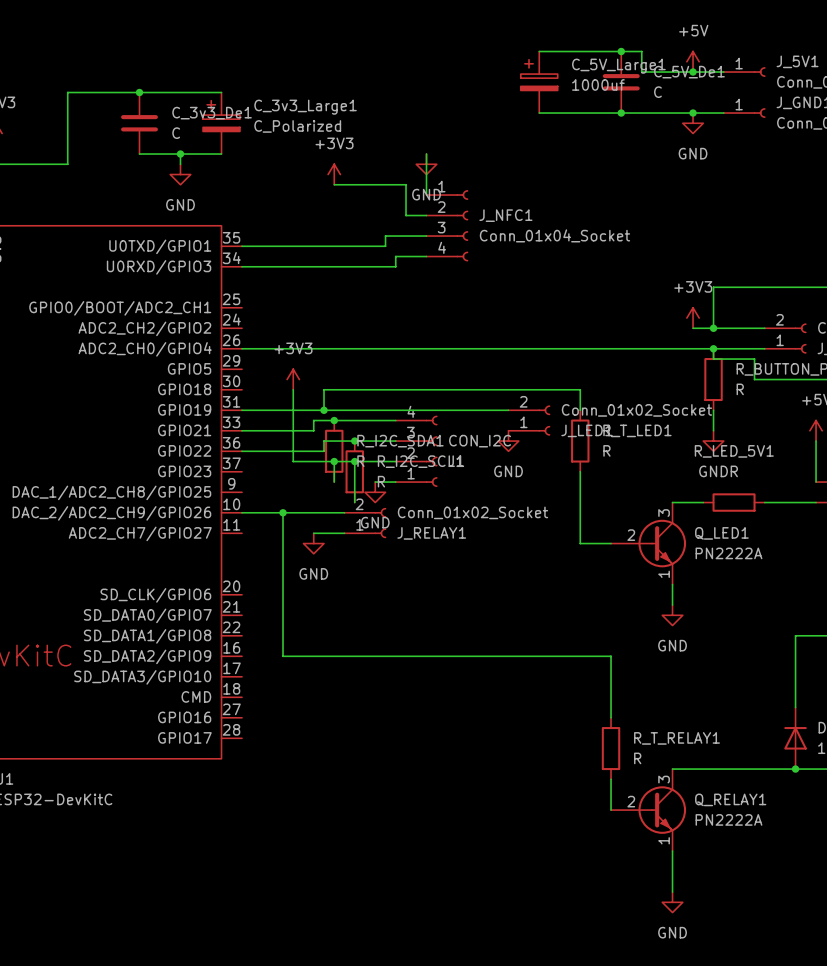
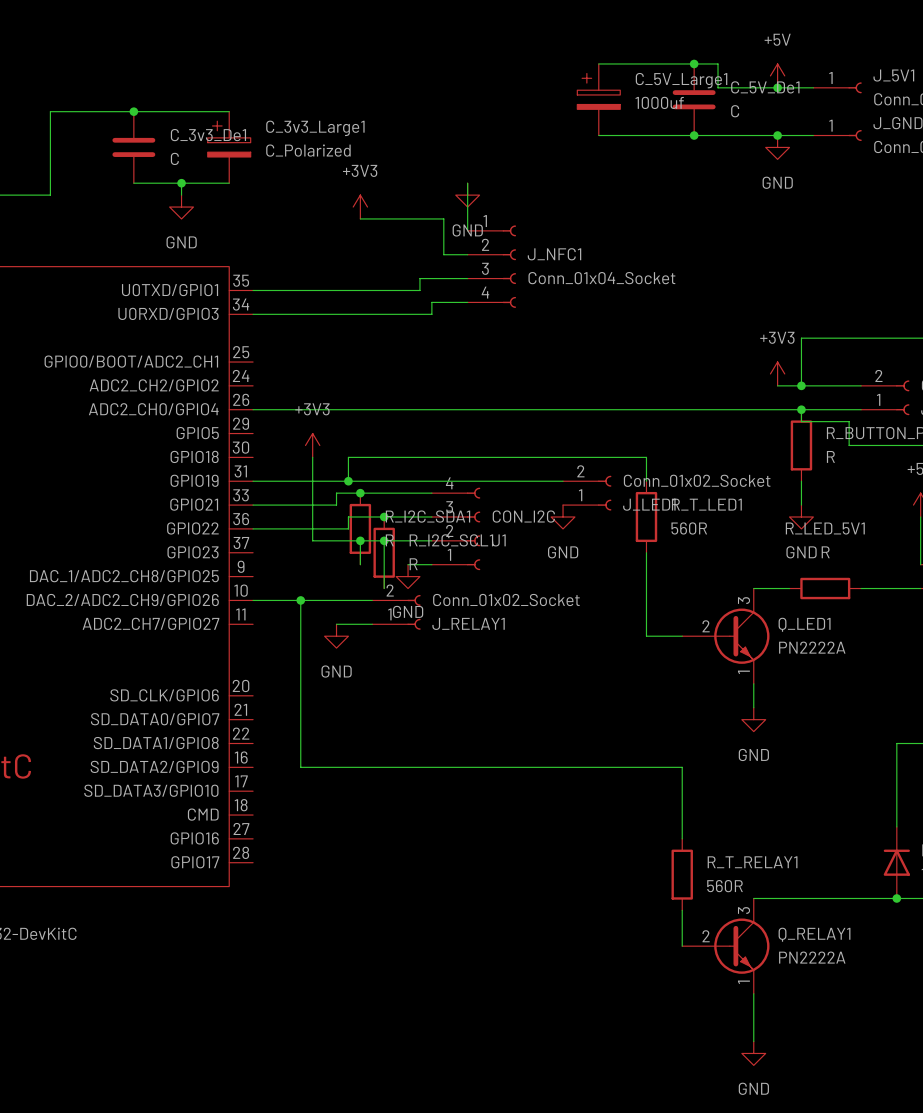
R_T_LED1 value: R (606, 450) -> 560R (689, 528)
R_T_RELAY1 value: R (637, 758) -> 560R (725, 886)

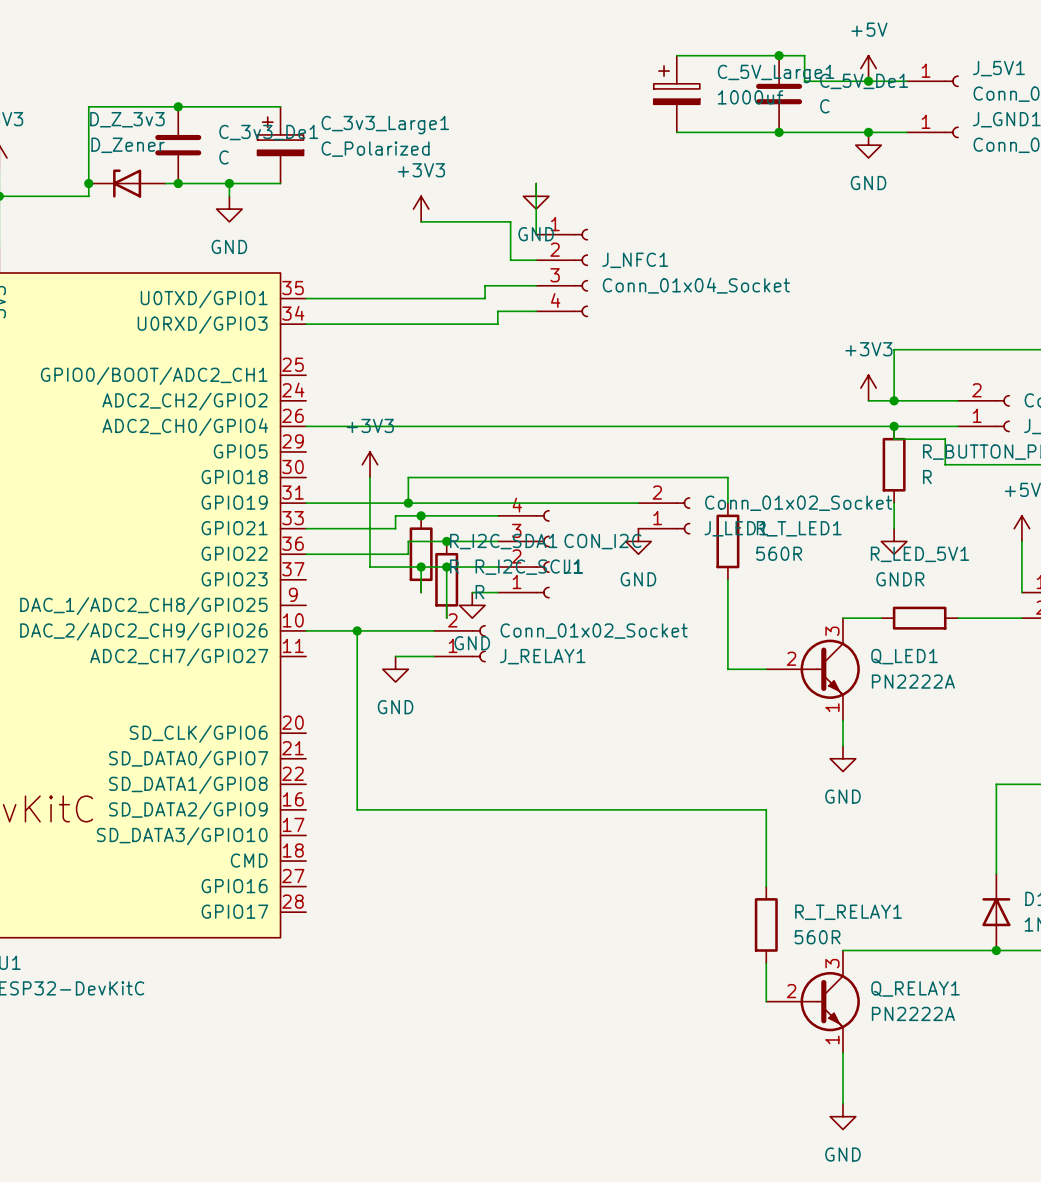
junction: none -> (88, 183)
D_Z_3v3: none -> D_Zener (127, 183)
wire: none -> (165, 183) (178, 183)
junction: none -> (178, 183)

